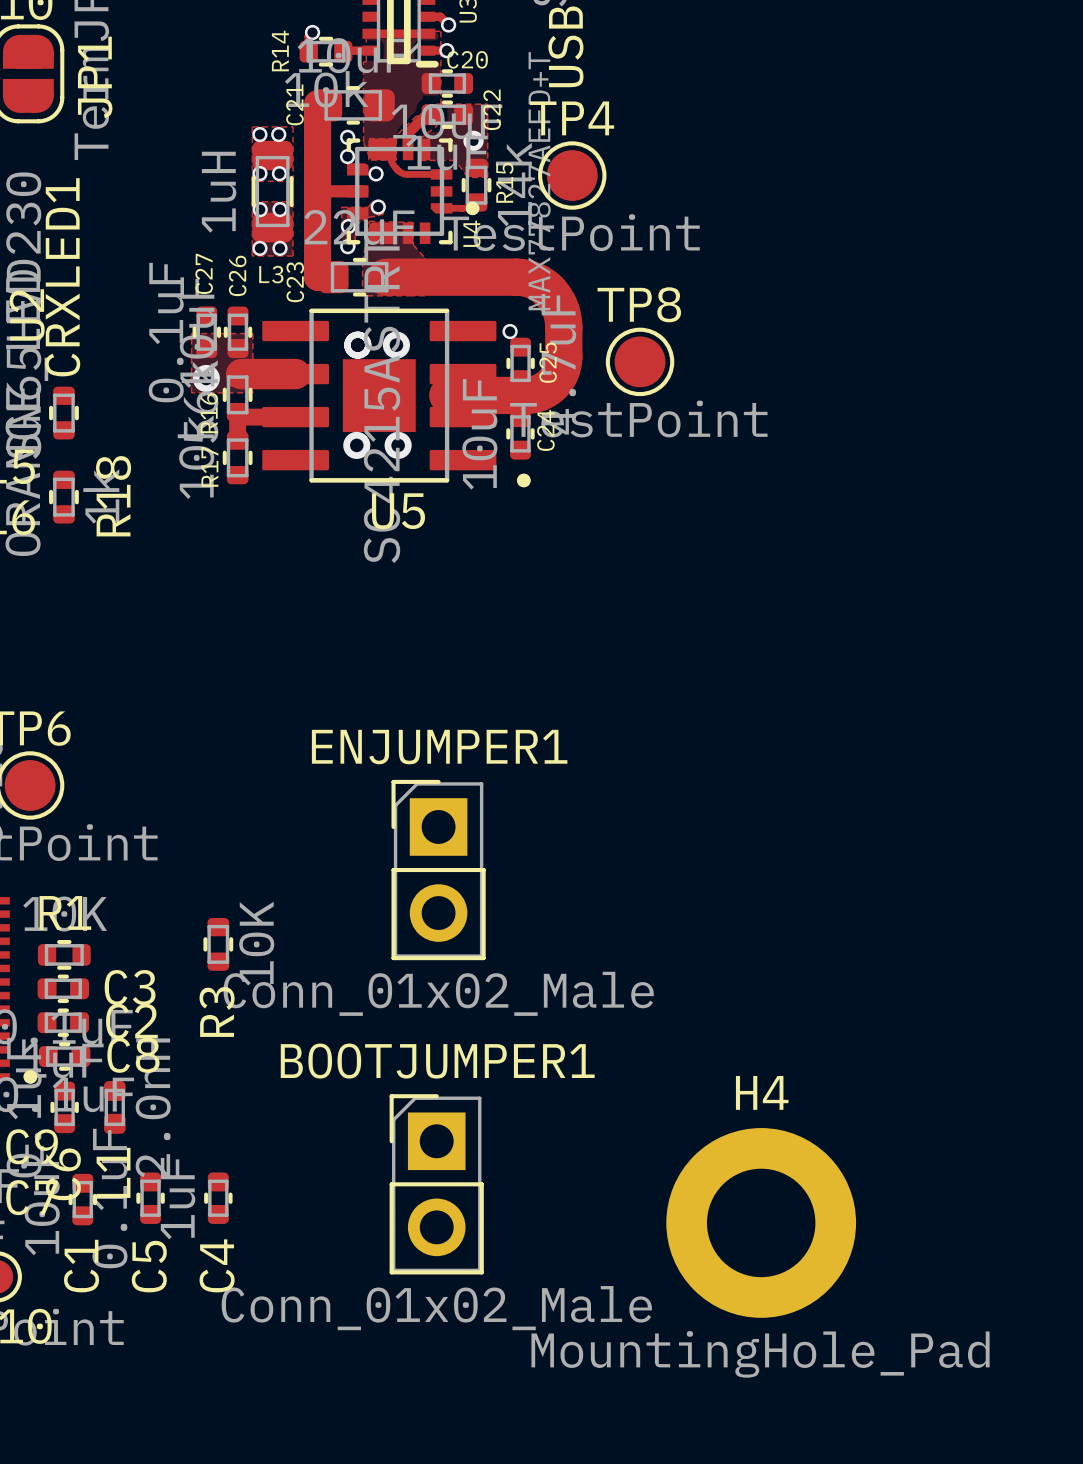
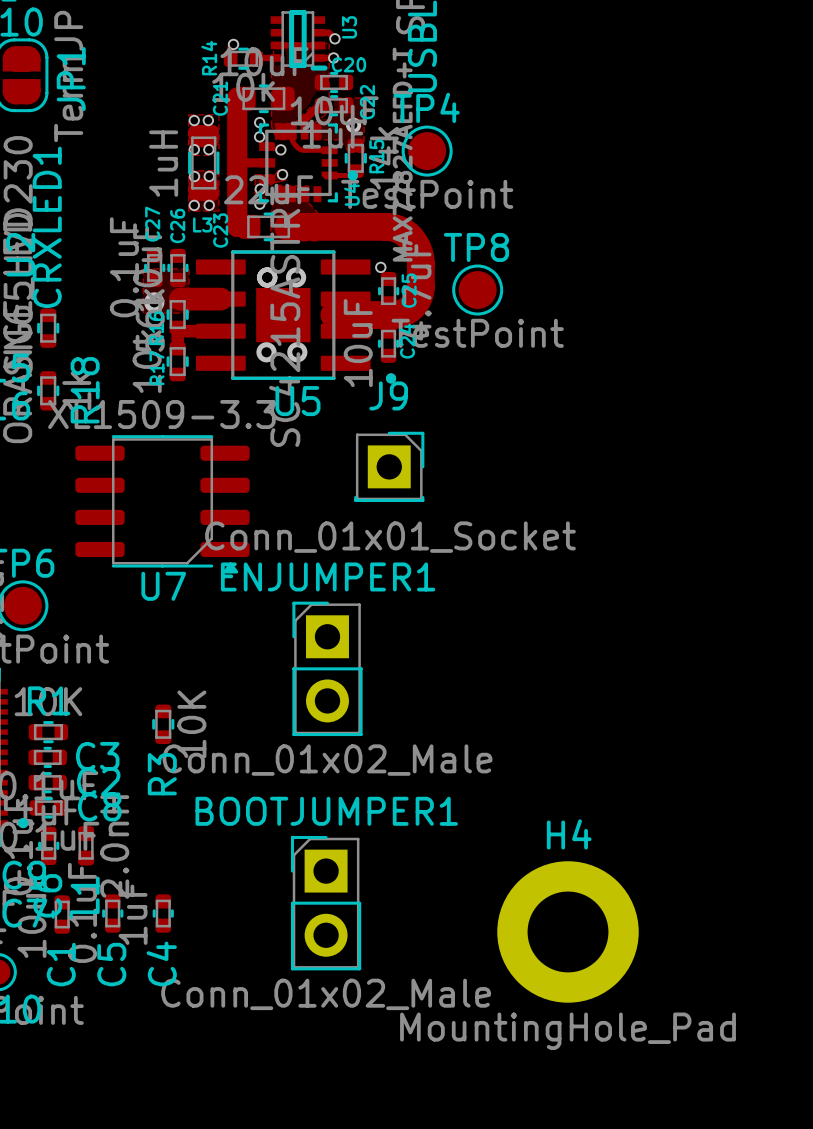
J9: none -> Conn_01x01_Socket (389, 466)
U7: none -> XL1509-3.3 (162, 504)

